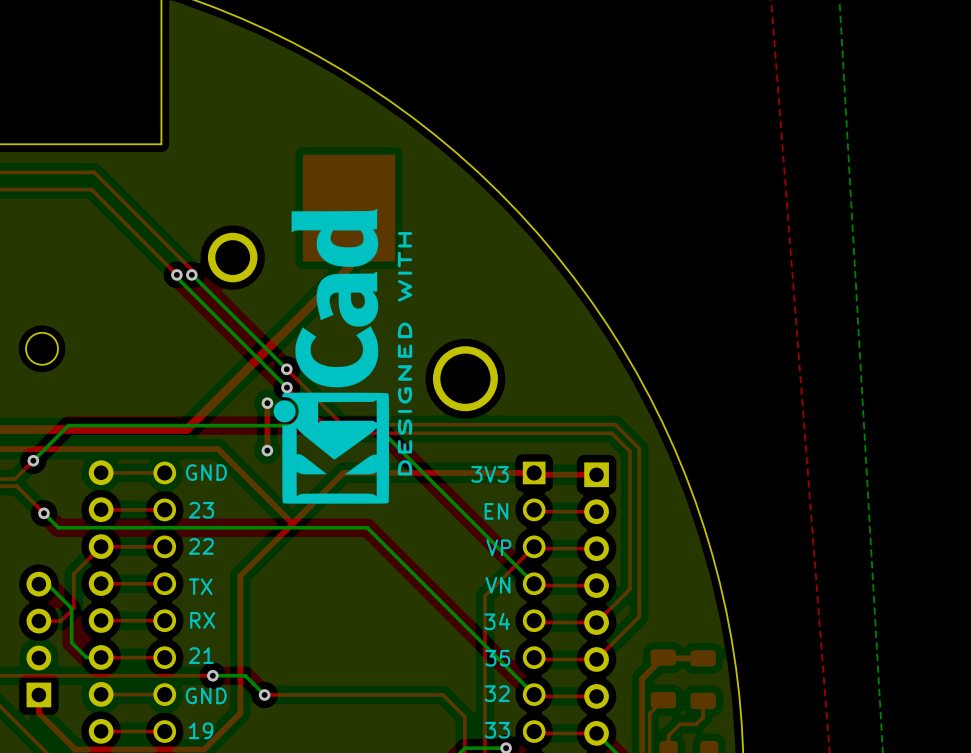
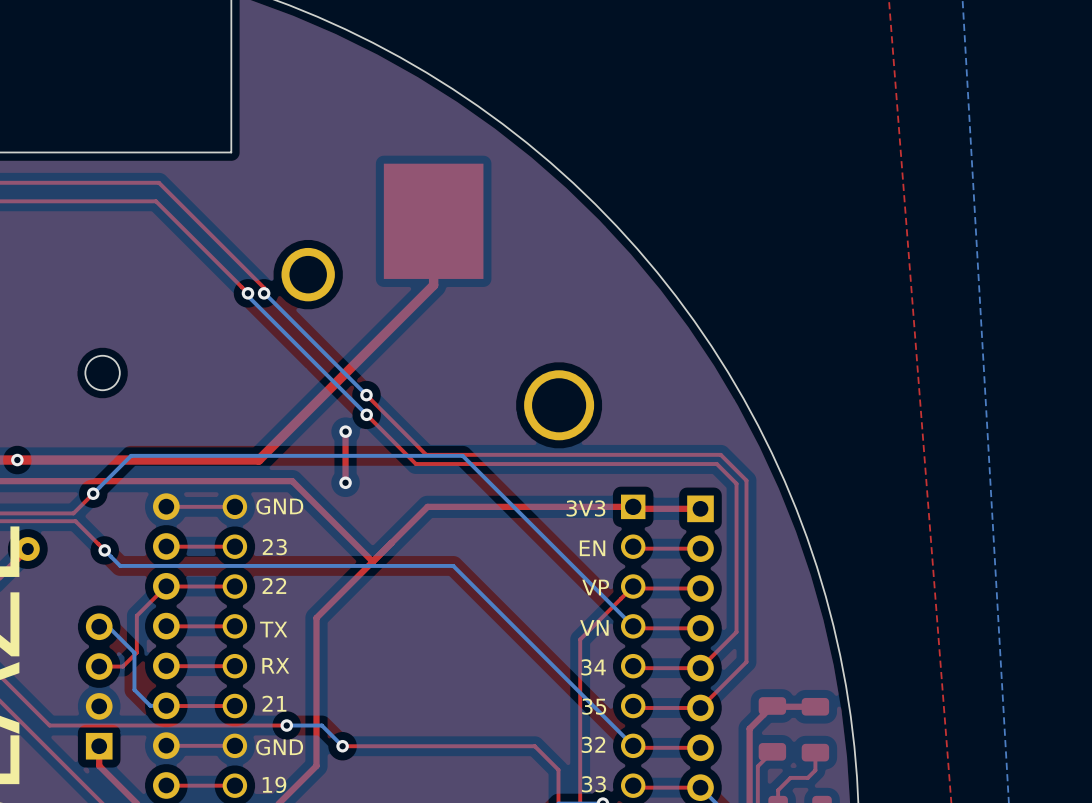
drawing: [273, 208, 413, 504] -> none

